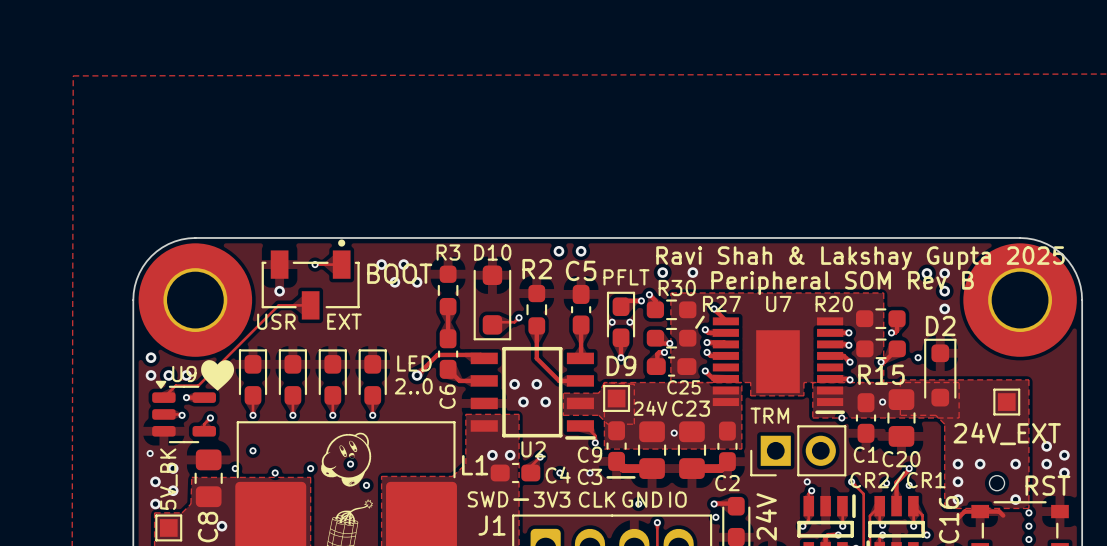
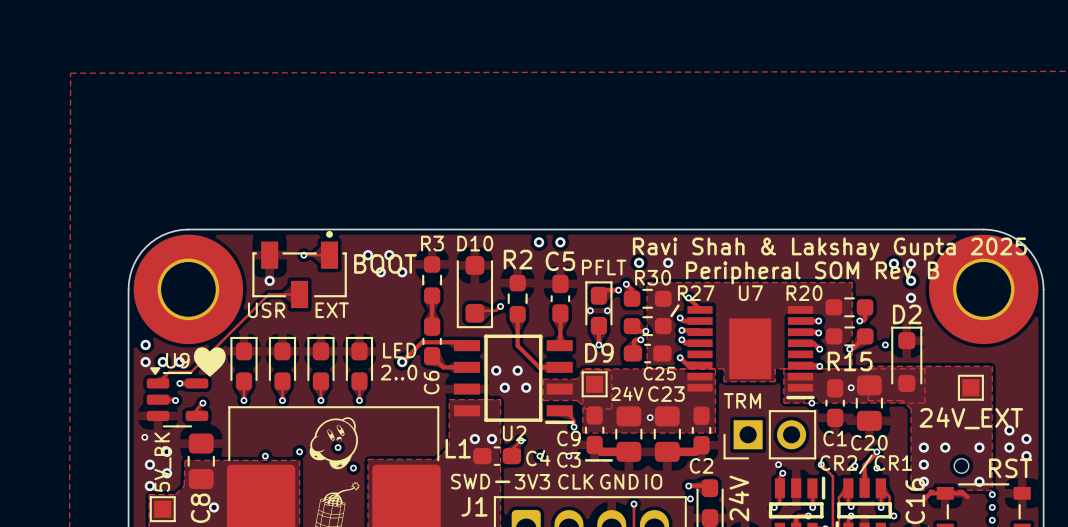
via: (253, 450) -> none
via: (235, 468) -> none
via: (638, 504) -> none

